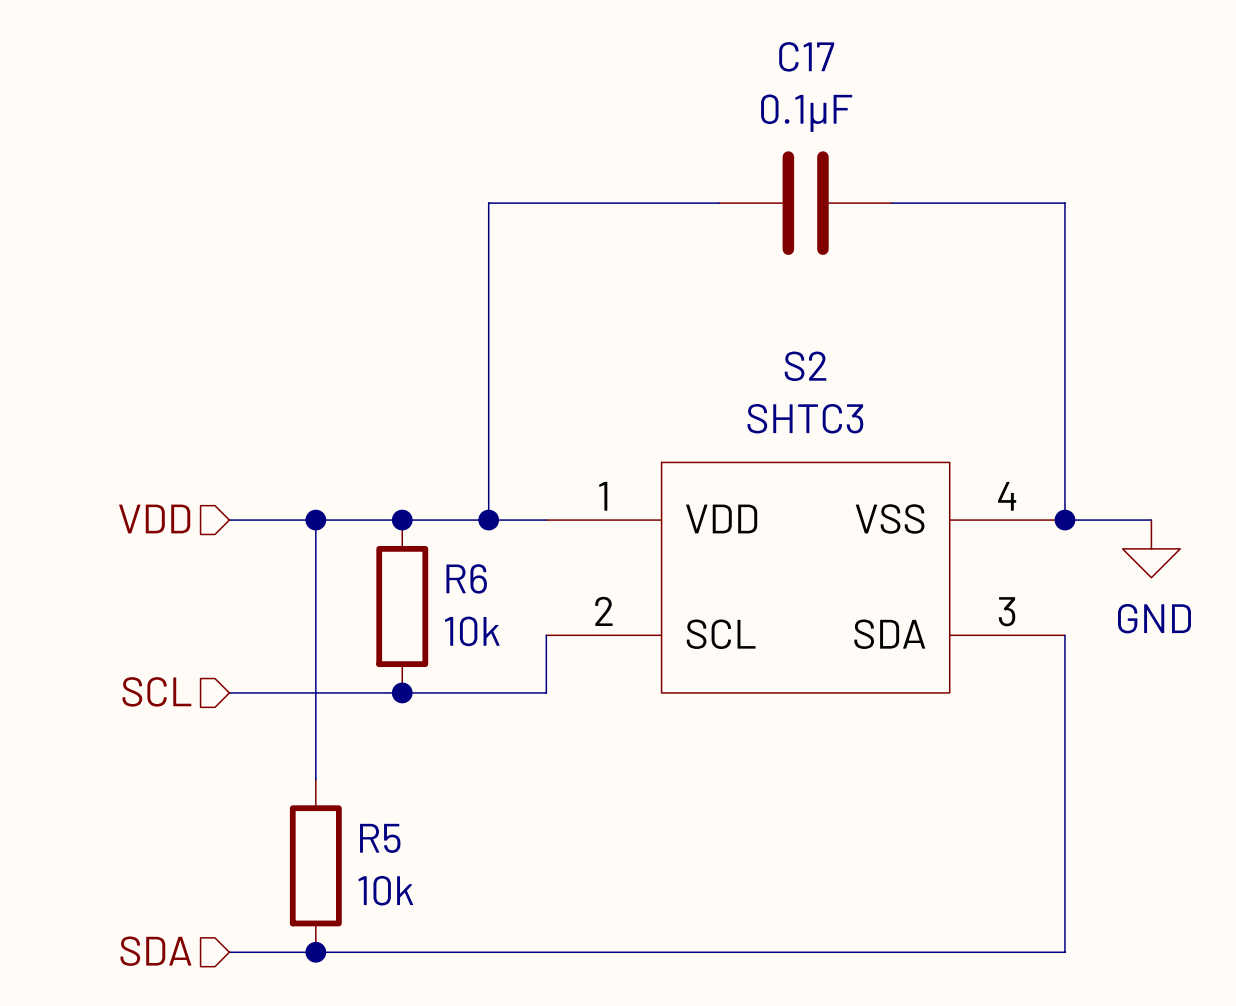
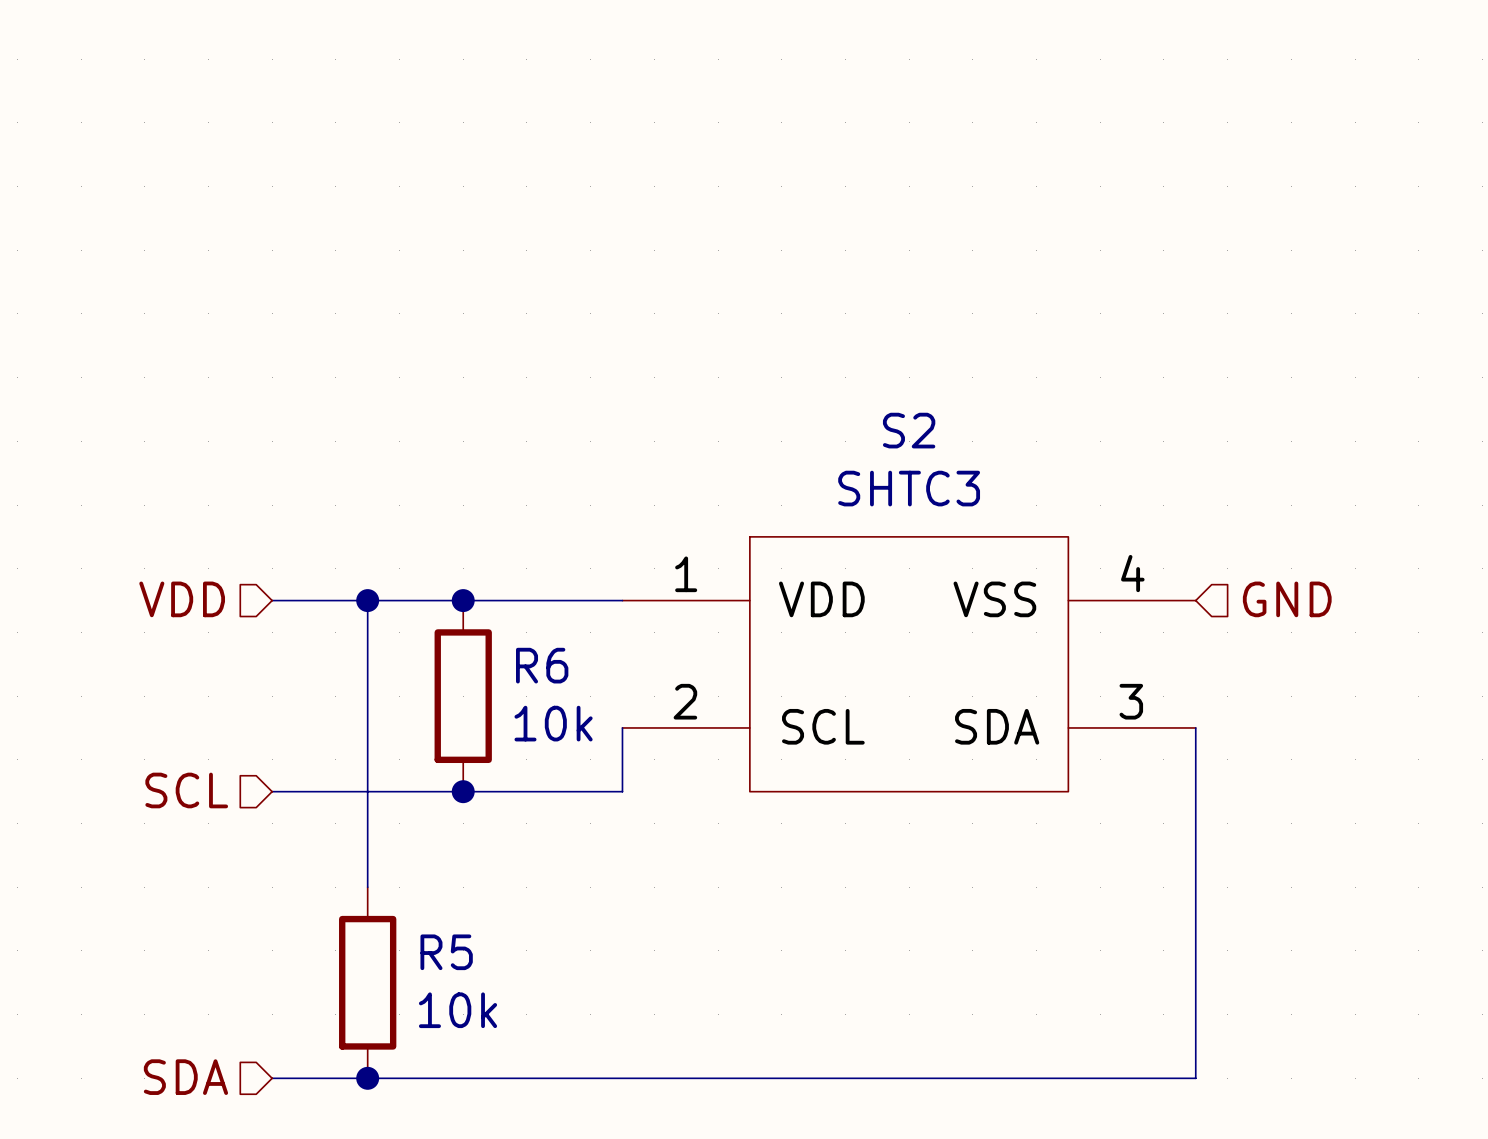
wire: (719, 203) (488, 203) (488, 520) -> none
C17: 0.1µF (805, 203) -> none
wire: (892, 203) (1064, 203) (1064, 520) (1151, 520) -> none
hierarchical label: none -> GND (1287, 599)
junction: (488, 520) -> none
junction: (1064, 520) -> none
power symbol: GND (1151, 548) -> none

